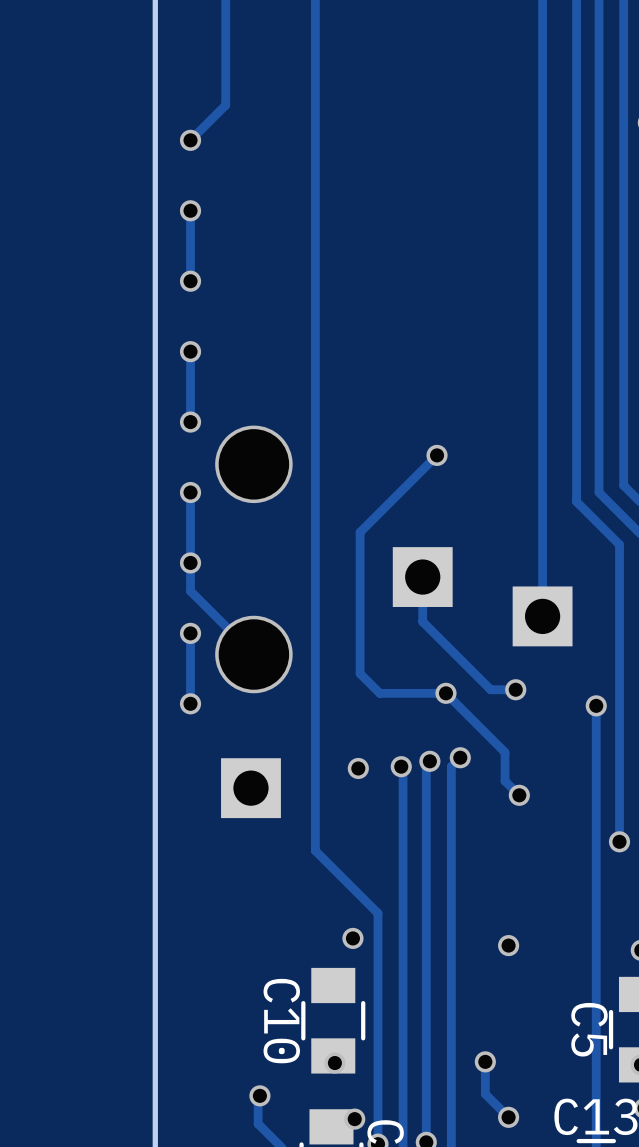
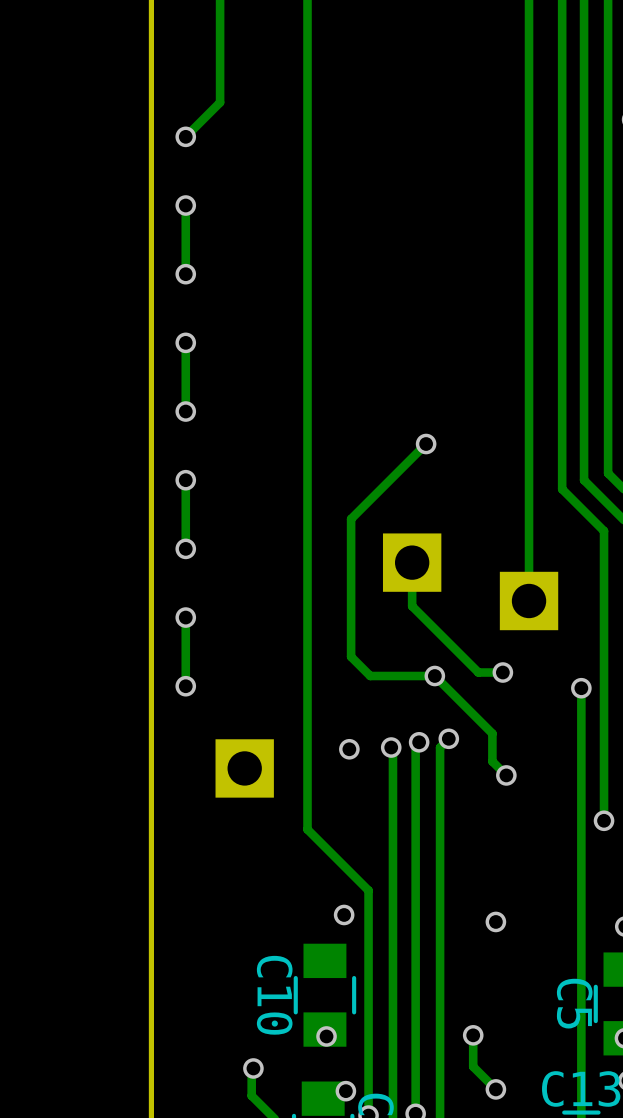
via: (253, 464) -> none
track: (190, 562) (190, 591) (253, 654) -> none
via: (253, 654) -> none

